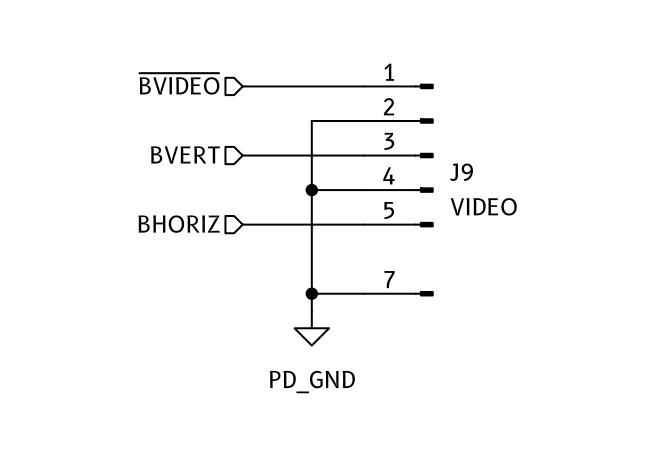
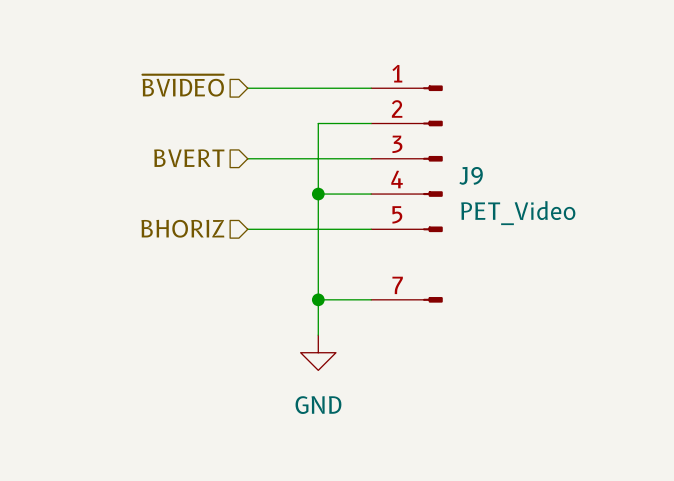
J9 value: VIDEO (483, 206) -> PET_Video (518, 213)
power symbol: PD_GND (311, 328) -> none
power symbol: none -> GND (318, 352)

